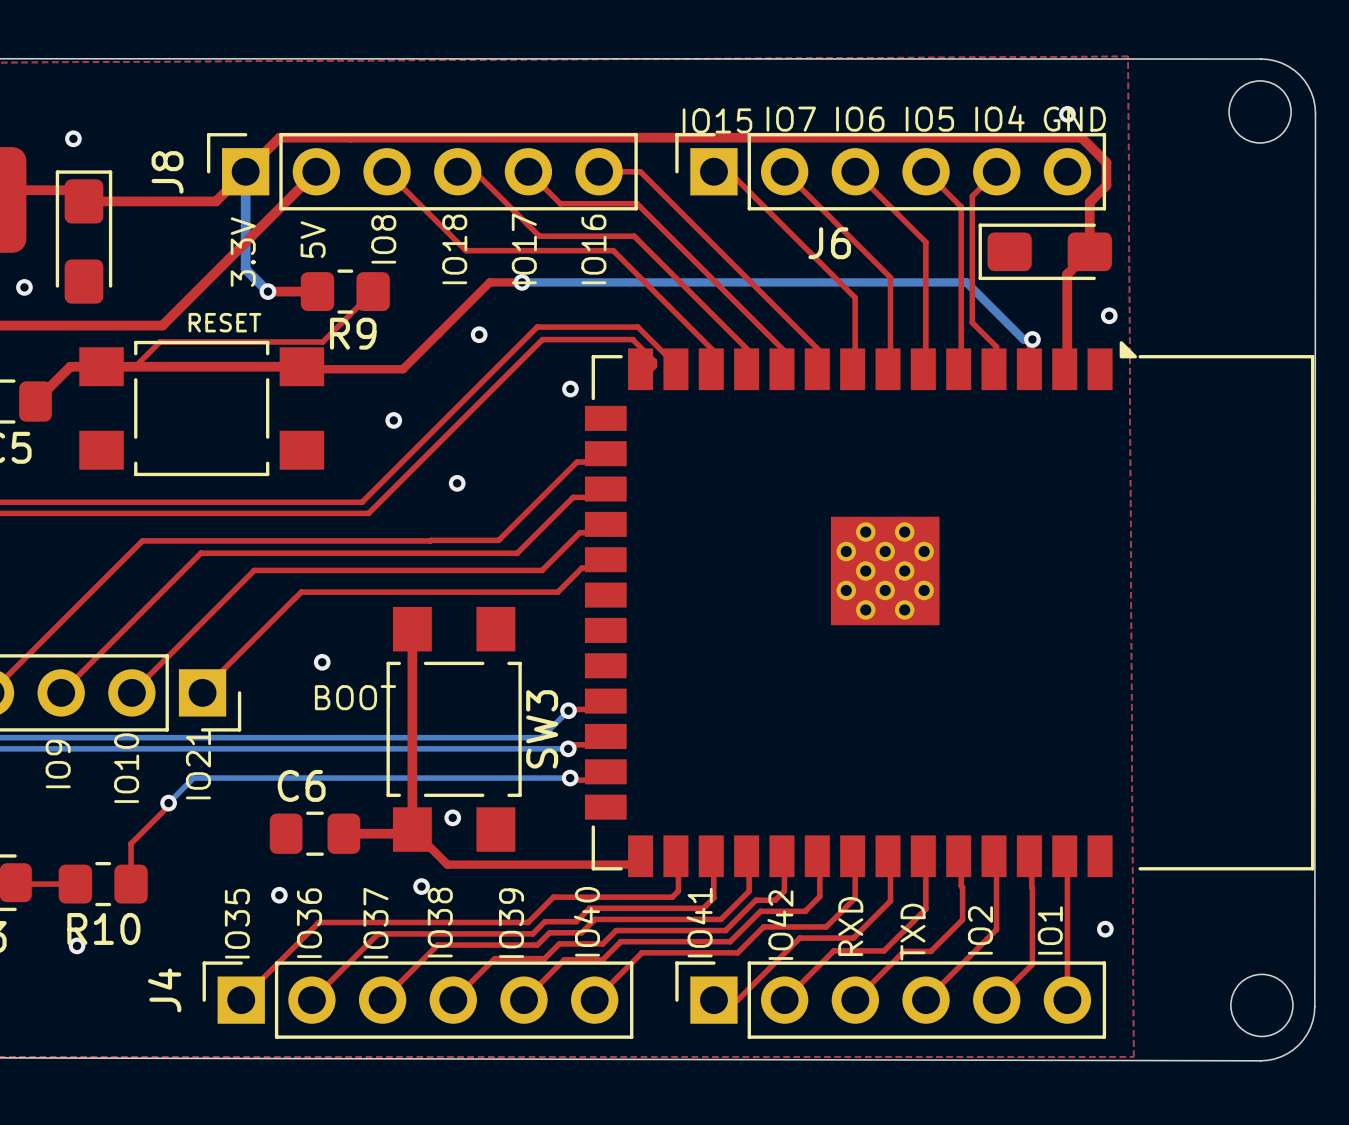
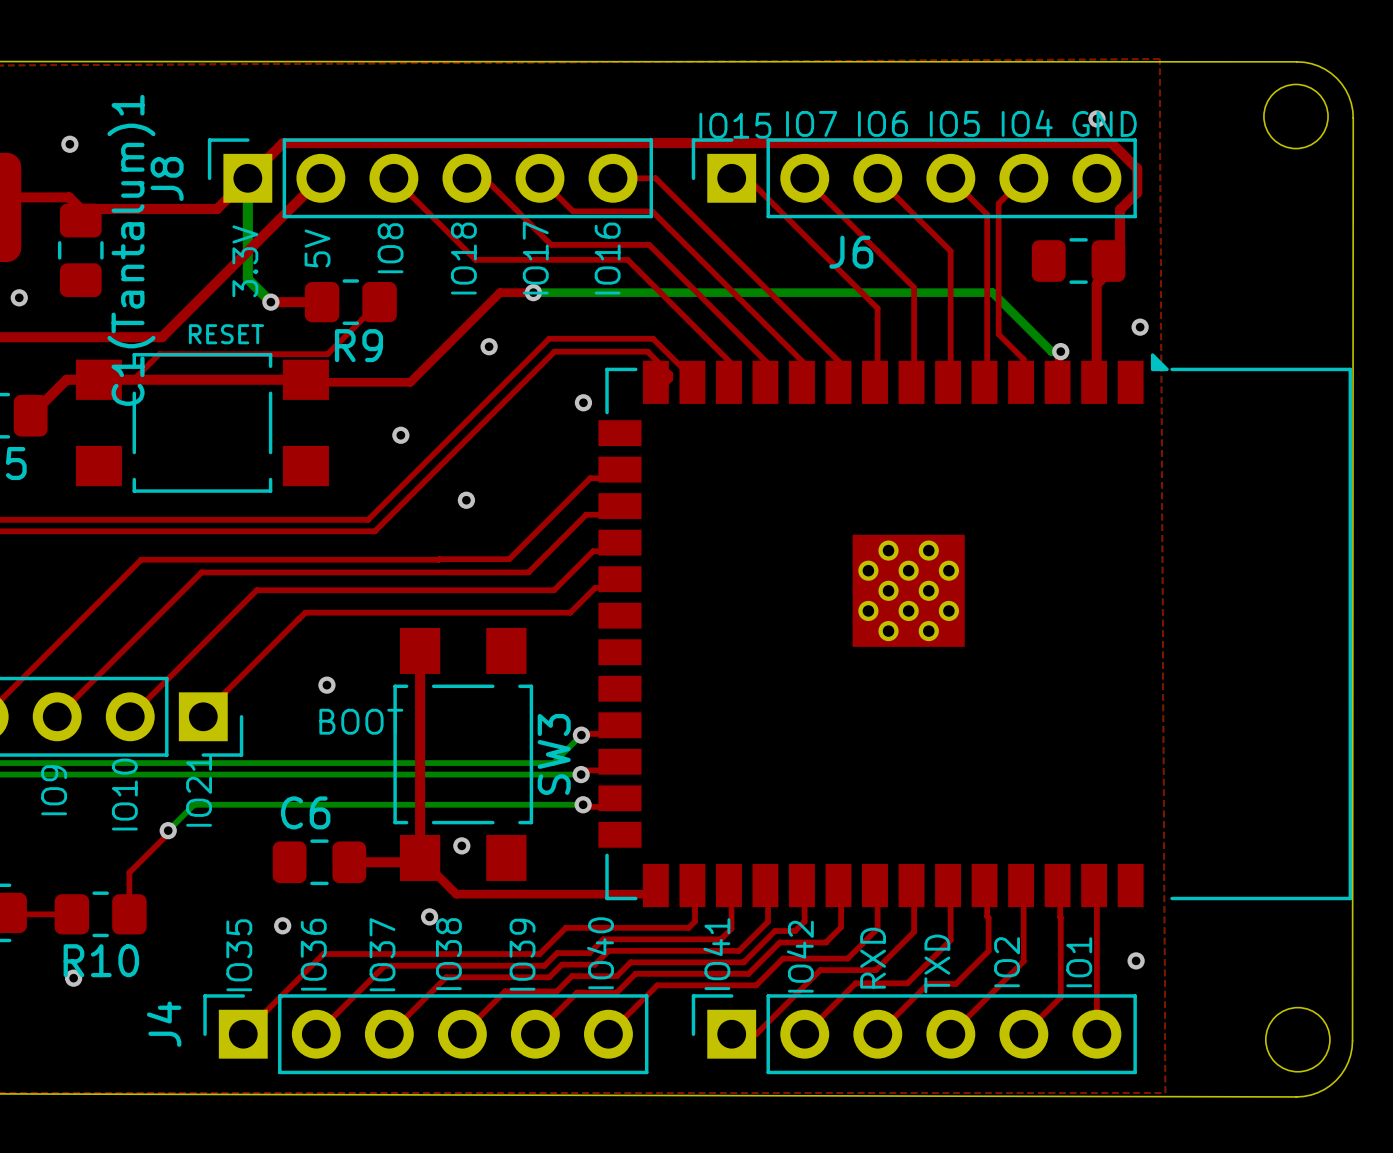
part footprint: [978, 223, 1112, 281] -> [1031, 238, 1126, 284]
part: (84, 237) -> none
C1(Tantalum)1: none -> (80, 250)

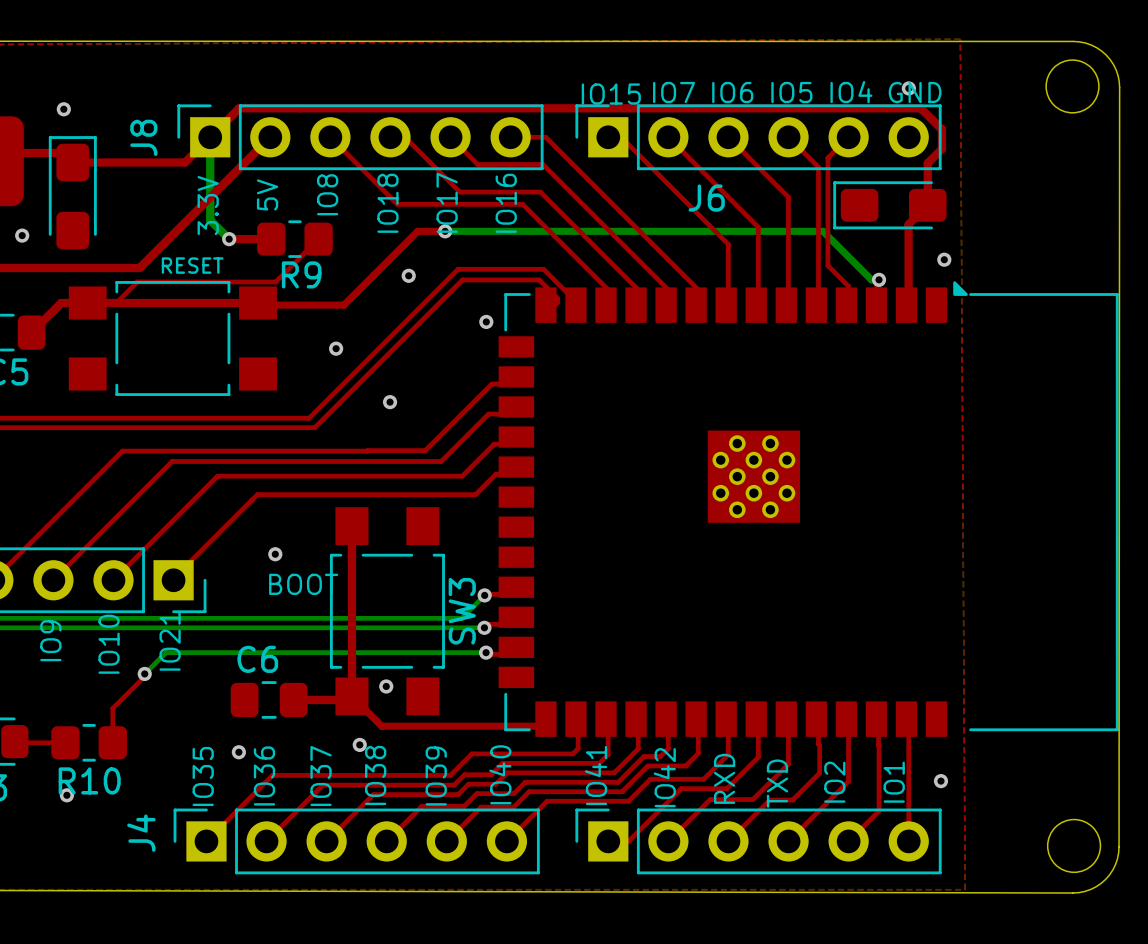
part footprint: [1031, 238, 1126, 284] -> [833, 181, 947, 230]
part: none -> (72, 192)
C1(Tantalum)1: (80, 250) -> none

